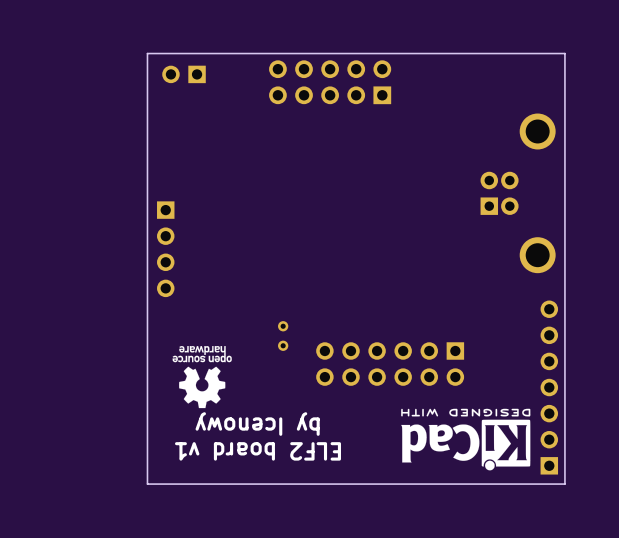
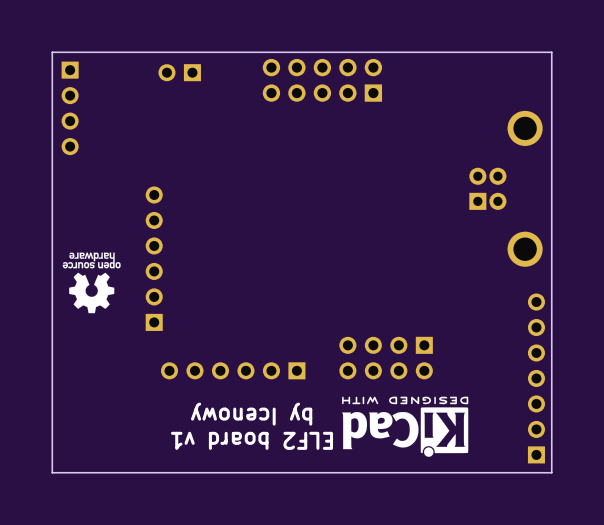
board edge: (147, 53) (147, 484) -> (144, 52) (52, 52) (52, 472) (144, 472)
part position: (165, 249) -> (70, 108)
part: none -> (154, 258)
part: (283, 336) -> none
part footprint: [316, 342, 465, 386] -> [339, 336, 433, 380]
drawing position: (202, 377) -> (91, 282)
part: none -> (233, 370)
drawing position: (465, 439) -> (405, 426)

